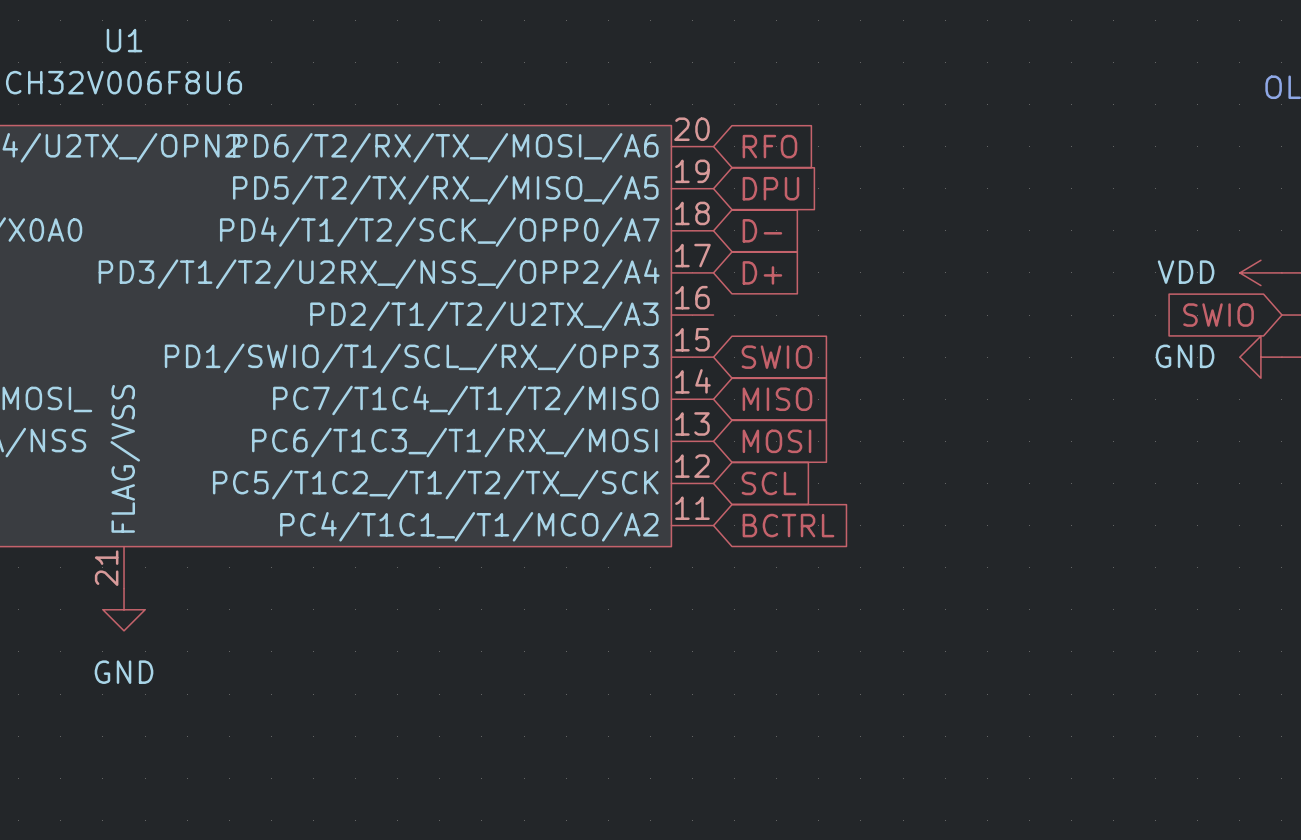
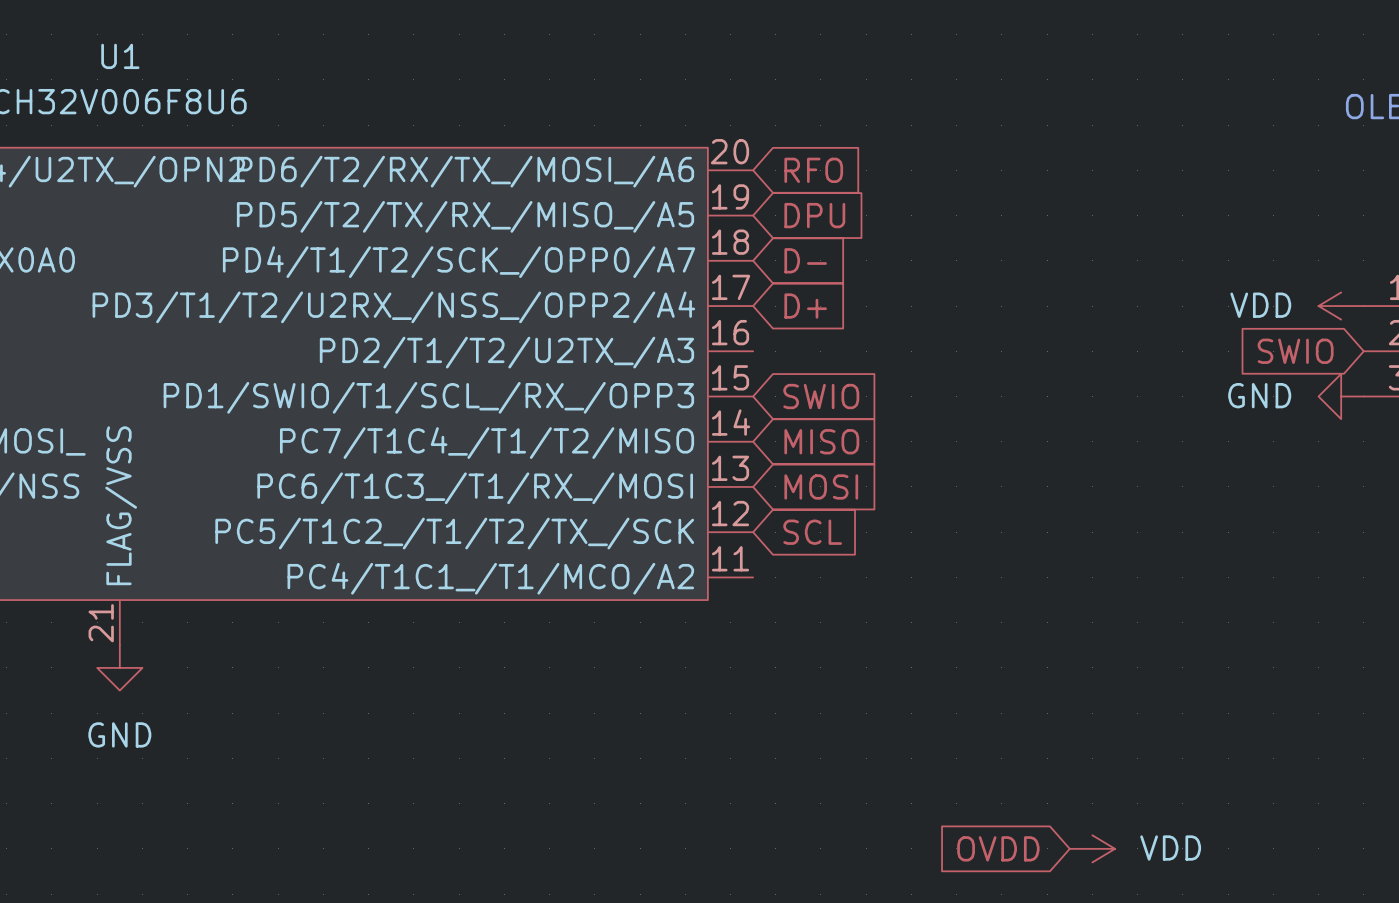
global label: BCTRL (788, 525) -> none
global label: none -> OVDD (998, 848)
power symbol: none -> VDD (1092, 848)

